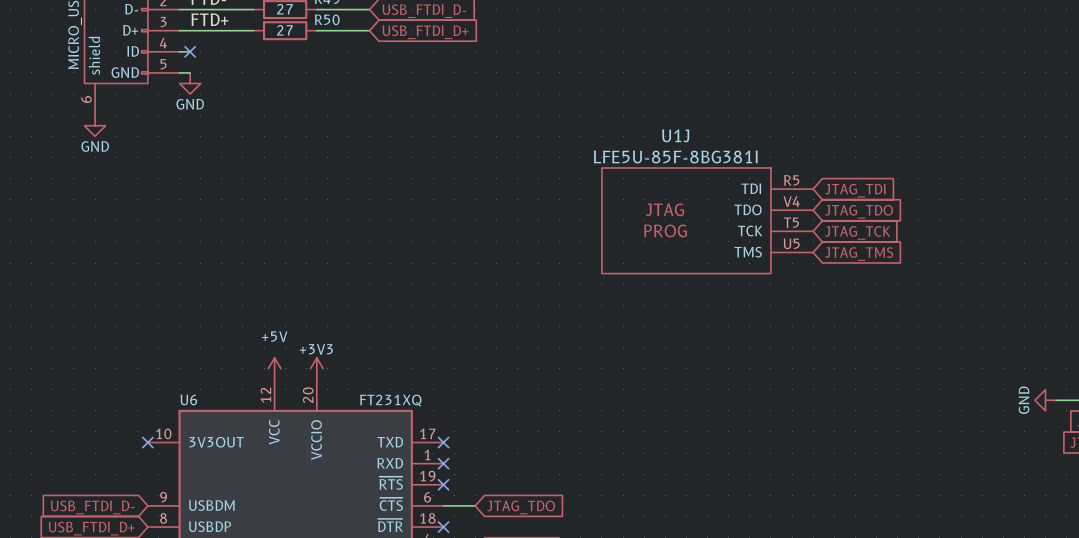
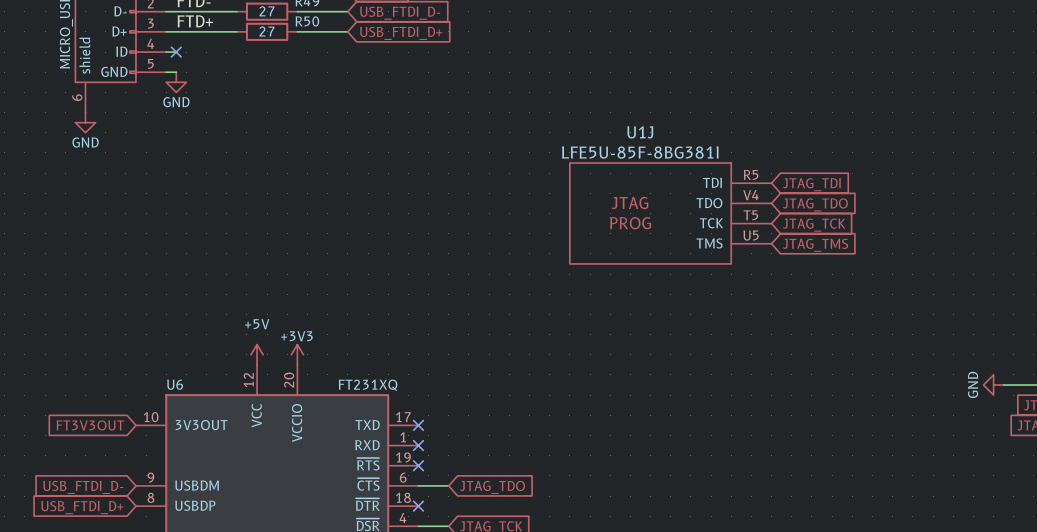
global label: none -> FT3V3OUT (90, 425)
no-connect mark: (147, 442) -> none

